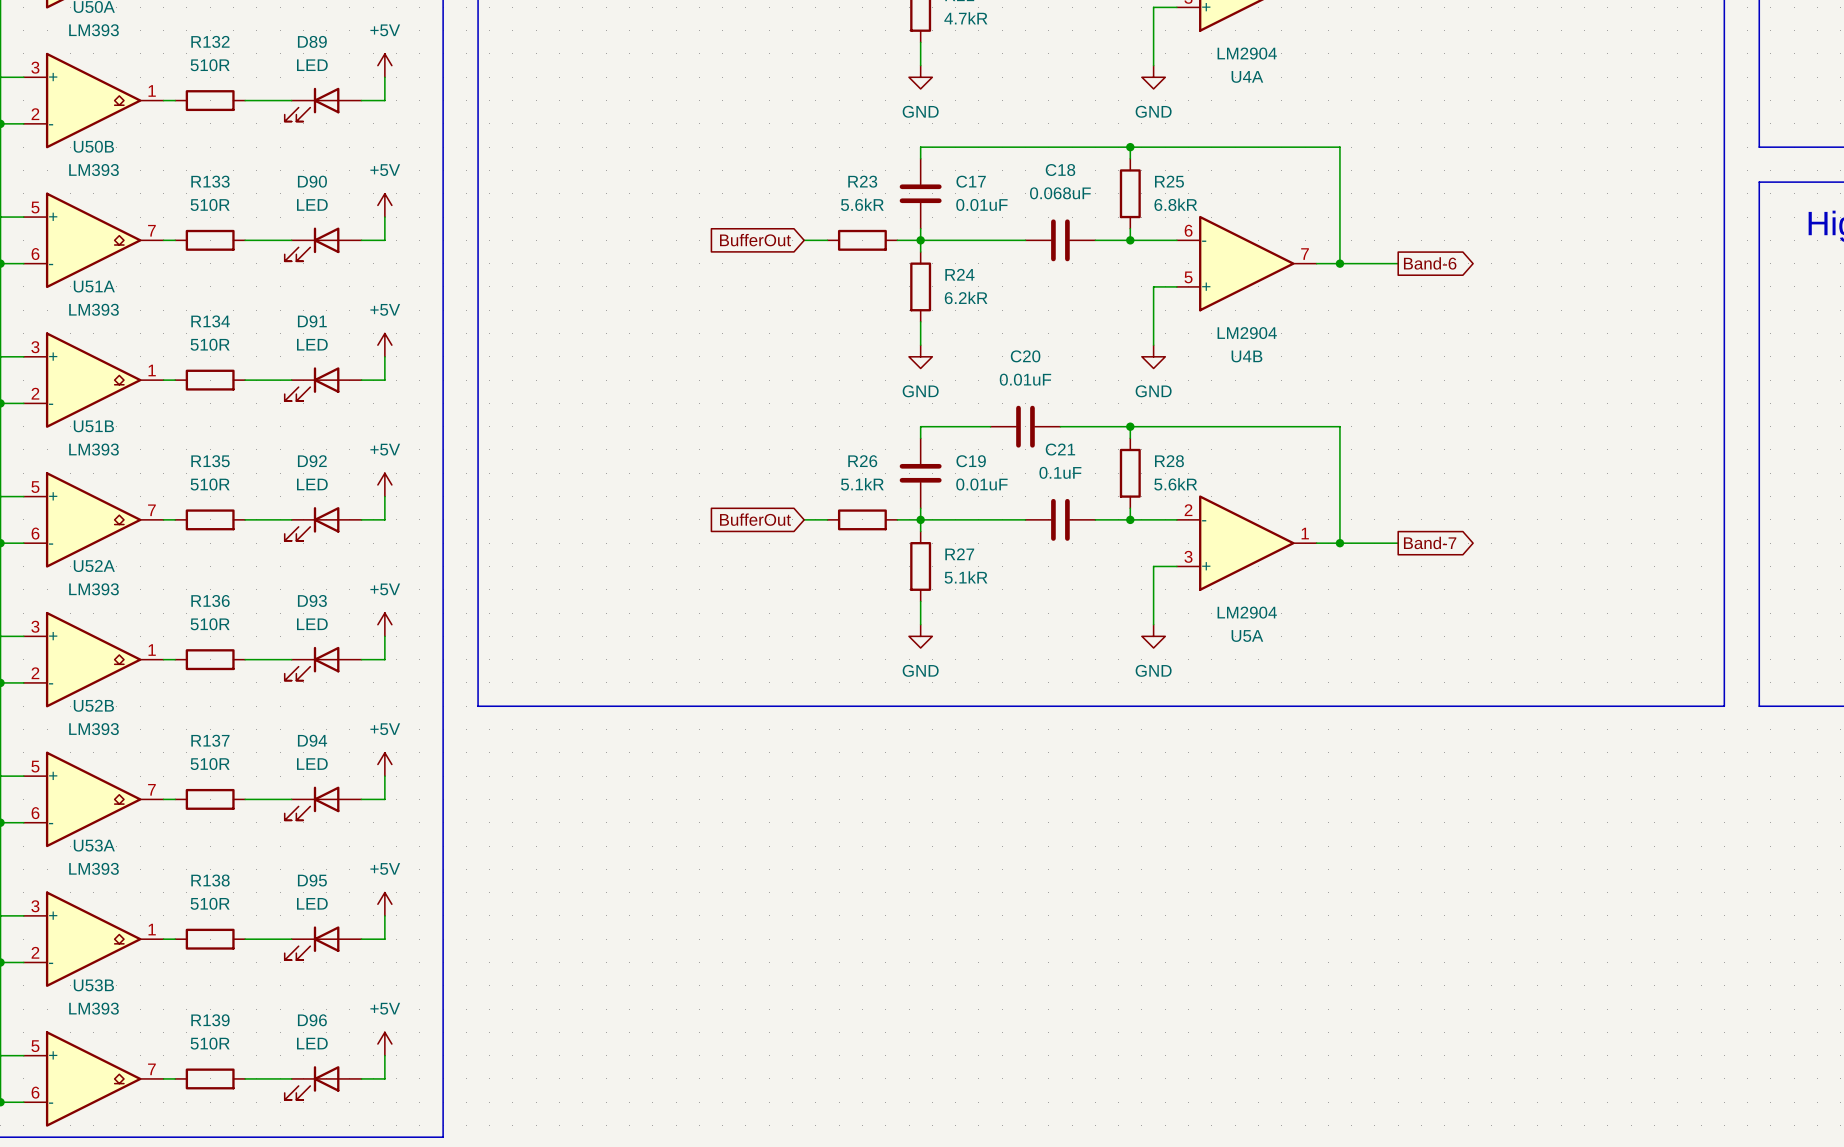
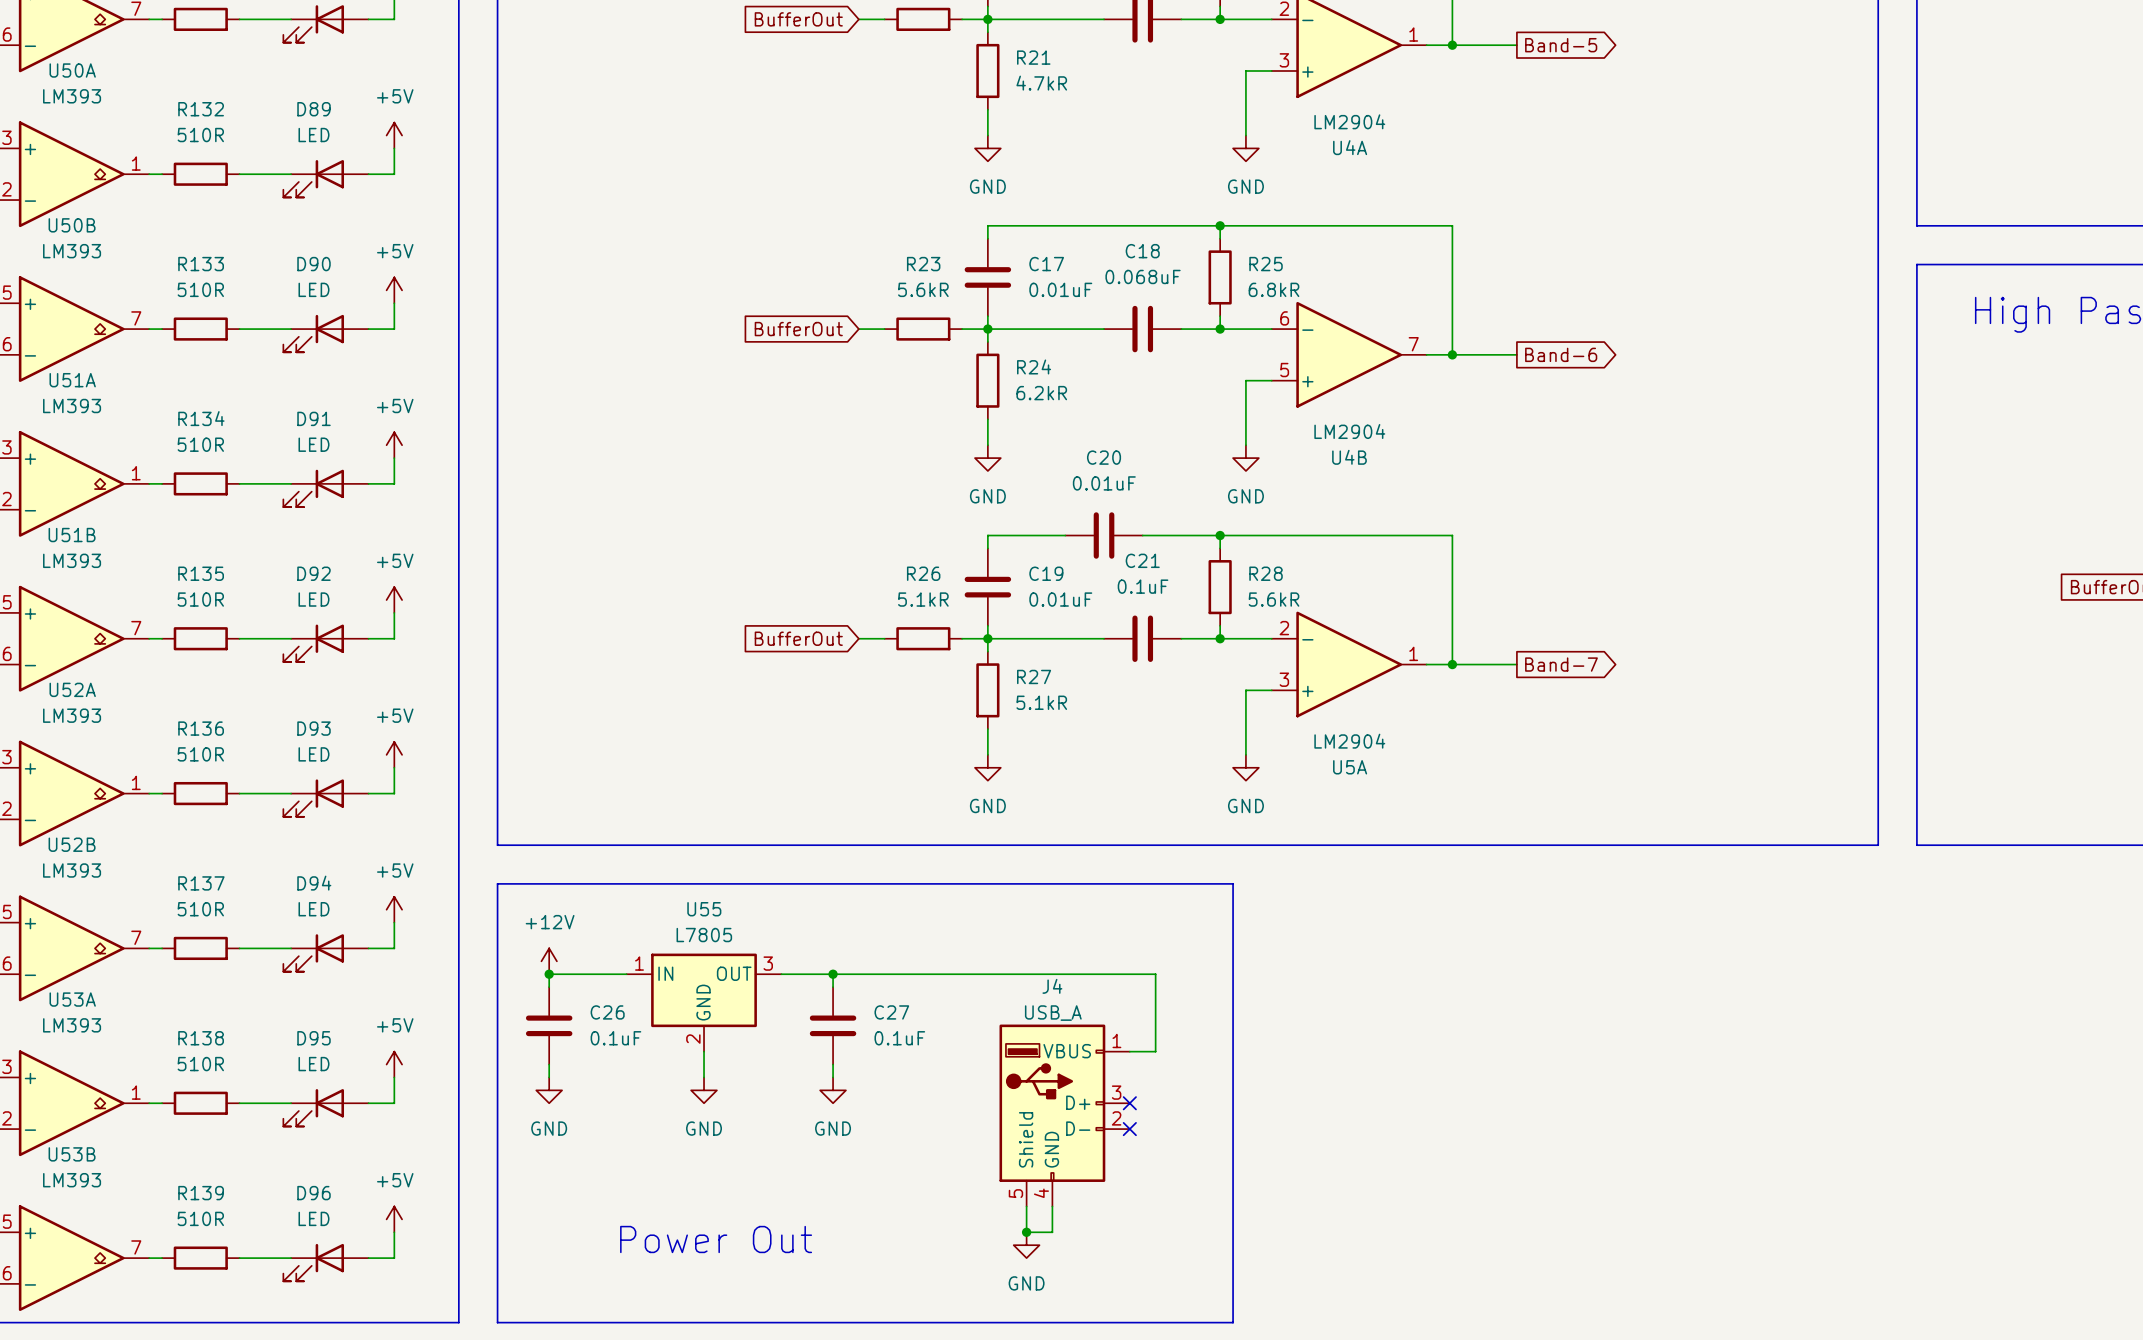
line: none -> (497, 883) (1233, 883) (1233, 1322) (497, 1322) (497, 883)
power symbol: none -> +12V (549, 961)
junction: none -> (549, 974)
wire: none -> (626, 974) (549, 974) (549, 987)
wire: none -> (781, 974) (1155, 974) (1155, 1051) (1129, 1051)
wire: none -> (833, 974) (833, 987)
junction: none -> (833, 974)
U55: none -> L7805 (704, 1002)
C26: none -> 0.1uF (549, 1025)
C27: none -> 0.1uF (833, 1025)
wire: none -> (704, 1051) (704, 1077)
wire: none -> (549, 1064) (549, 1077)
wire: none -> (833, 1064) (833, 1077)
power symbol: none -> GND (549, 1090)
power symbol: none -> GND (704, 1090)
power symbol: none -> GND (833, 1090)
no-connect mark: none -> (1129, 1103)
J4: none -> USB_A (1064, 1115)
no-connect mark: none -> (1129, 1129)
wire: none -> (1026, 1206) (1026, 1232) (1052, 1232) (1052, 1206)
junction: none -> (1026, 1232)
text: none -> Power Out (716, 1239)
power symbol: none -> GND (1026, 1245)

